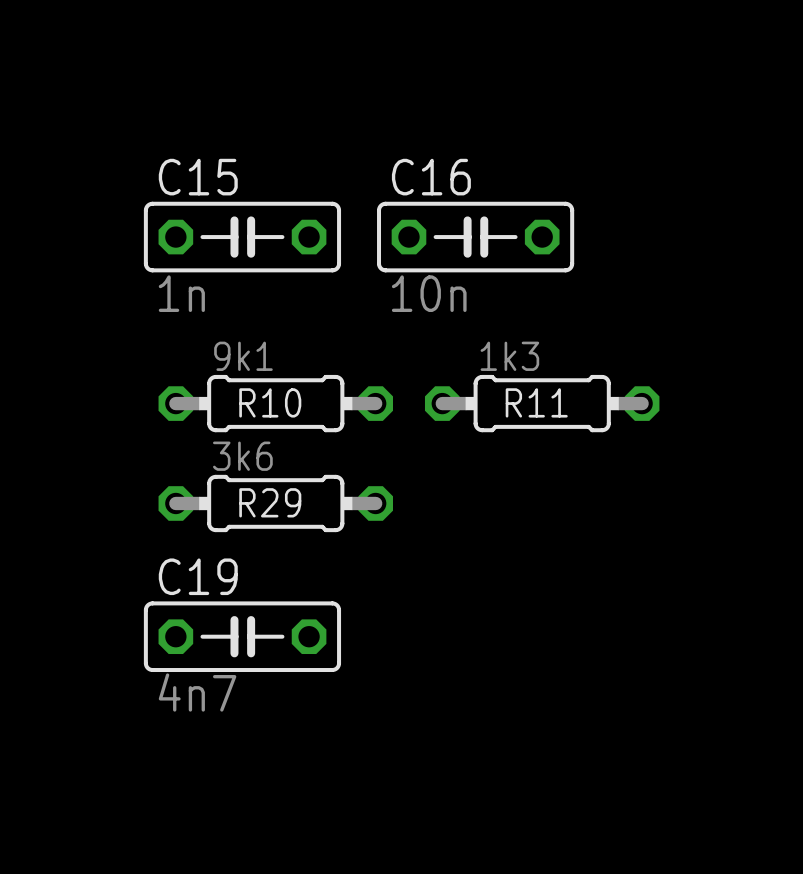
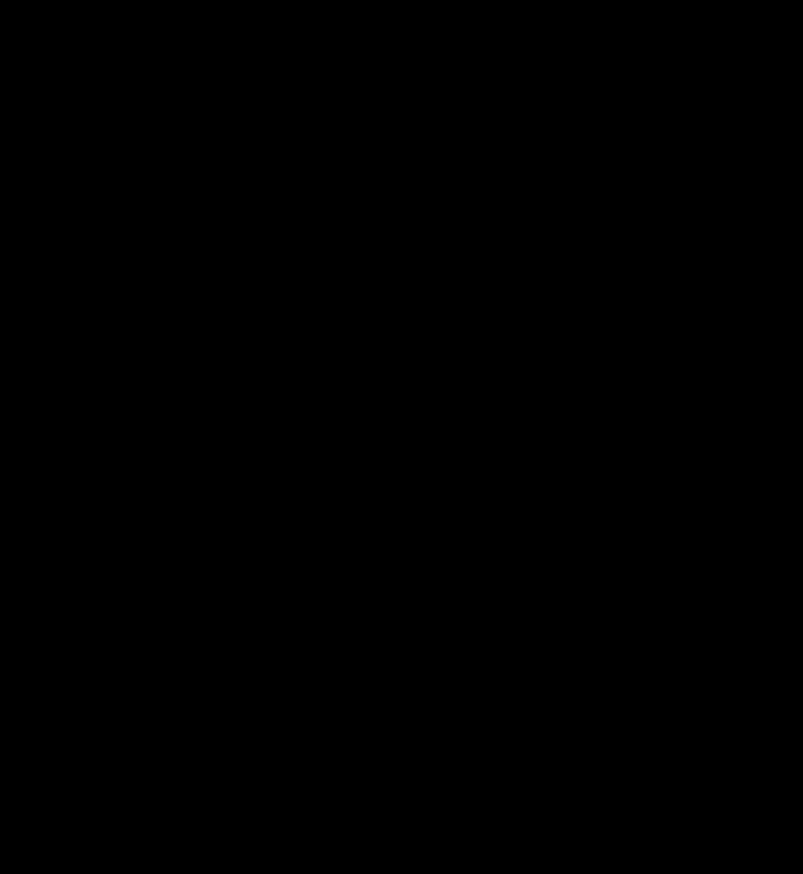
C15: 1n (242, 237) -> none
C16: 10n (475, 237) -> none
R10: 9k1 (275, 403) -> none
R11: 1k3 (542, 403) -> none
R29: 3k6 (275, 503) -> none
C19: 4n7 (242, 636) -> none

